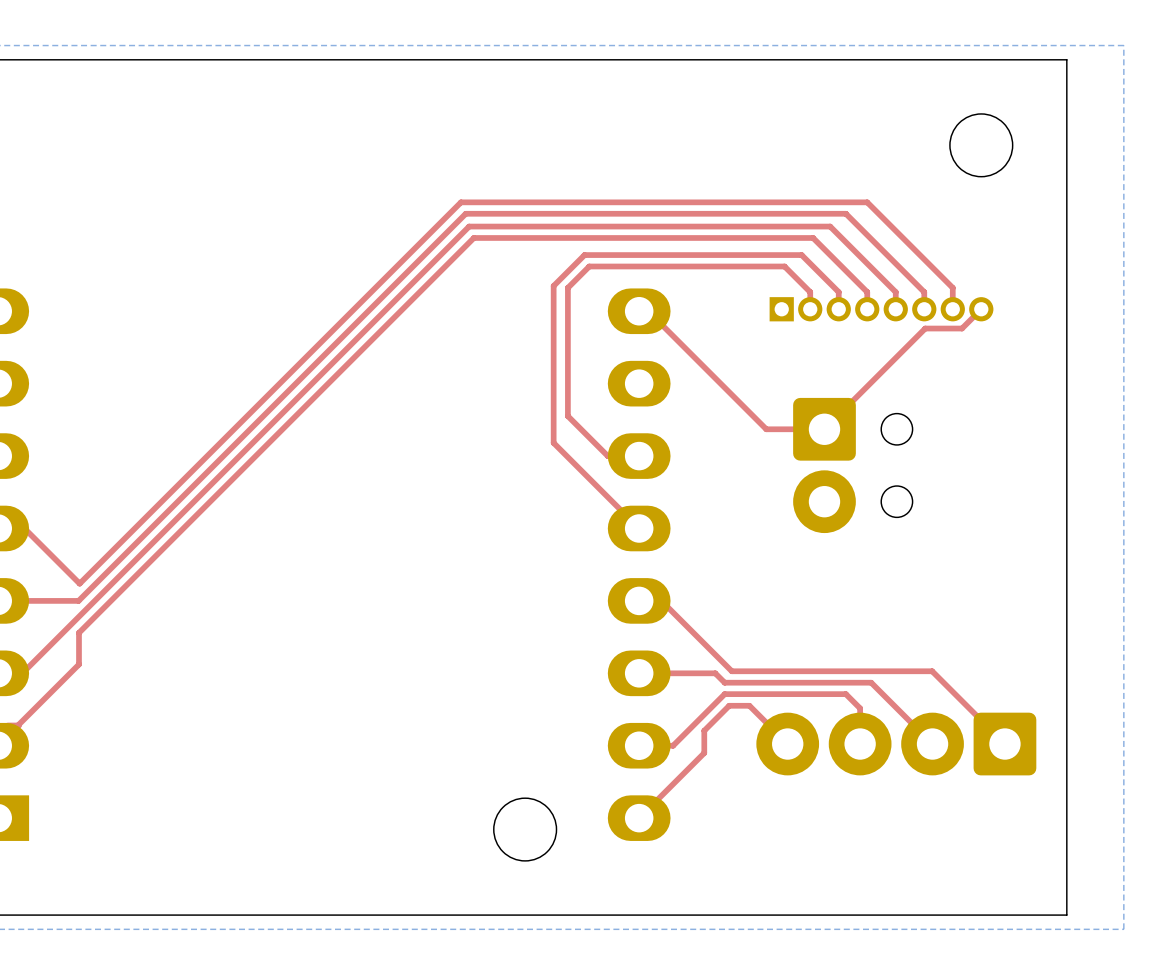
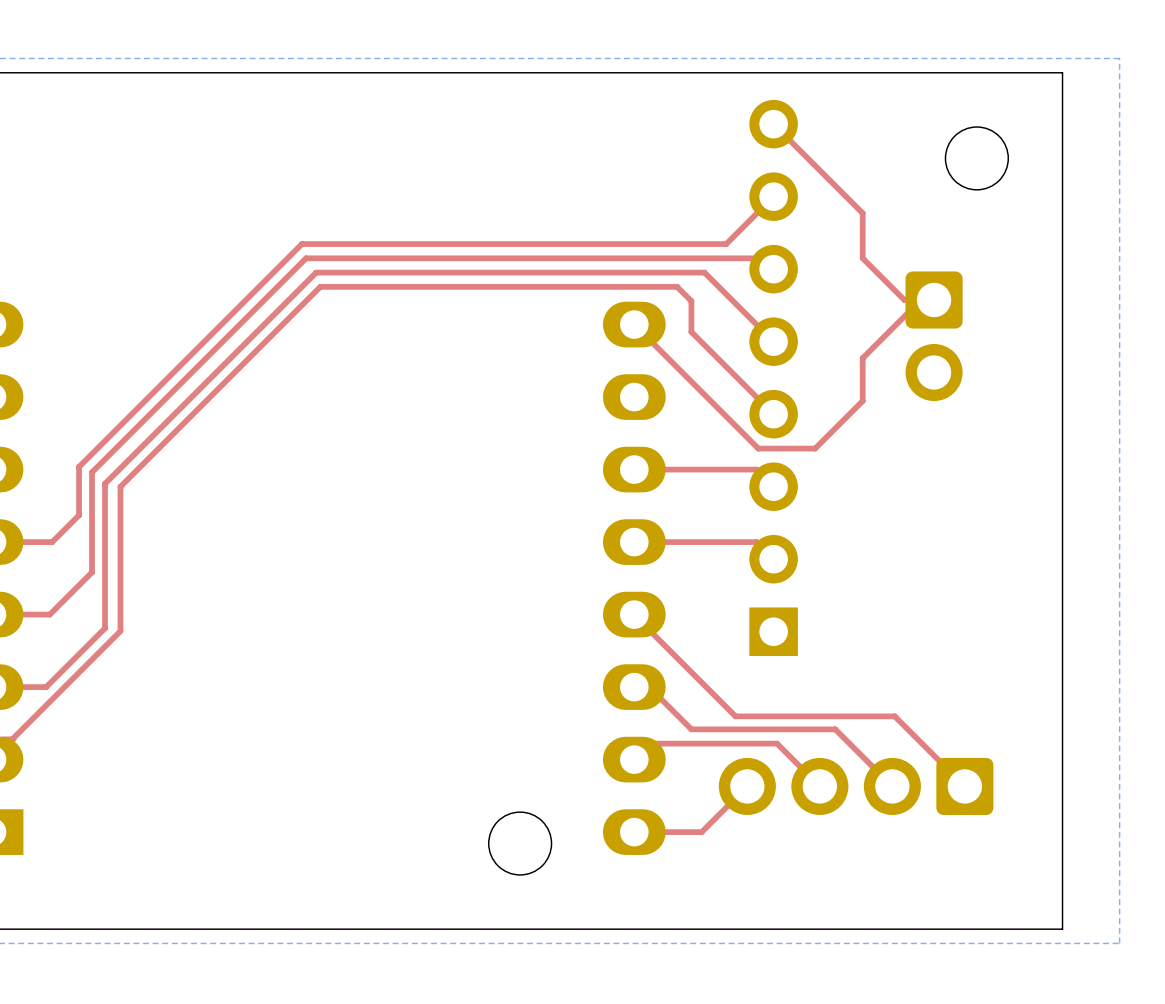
top track: none -> (773, 124) (862, 213) (862, 258) (904, 300) (934, 300)
top track: none -> (920, 300) (862, 358) (862, 401) (815, 448) (758, 448) (634, 324)
top track: (810, 309) (810, 292) (784, 266) (589, 266) (567, 287) (567, 416) (607, 456) (639, 456) -> (773, 486) (756, 469) (634, 469)
top track: (838, 309) (838, 292) (801, 255) (584, 255) (553, 285) (553, 442) (639, 528) -> (773, 559) (756, 542) (634, 542)
top track: (867, 309) (867, 292) (813, 237) (473, 237) (78, 632) (78, 664) -> (773, 414) (691, 331) (691, 301) (677, 286) (320, 286) (120, 486) (120, 631) (73, 678)
part: (881, 309) -> none
top track: (895, 309) (895, 292) (830, 226) (469, 226) (22, 673) -> (773, 341) (704, 272) (316, 272) (105, 483) (105, 628) (46, 687) (16, 687)
top track: (924, 309) (924, 292) (845, 213) (465, 213) (78, 600) (55, 600) -> (773, 269) (762, 258) (306, 258) (92, 472) (92, 572) (49, 614)
top track: (952, 309) (952, 287) (867, 202) (461, 202) (79, 583) (24, 528) -> (773, 196) (726, 244) (301, 244) (79, 466) (79, 515) (52, 542) (18, 542)
top track: (981, 309) (962, 328) (925, 328) (824, 429) (766, 429) (648, 311) -> none
part: none -> (934, 336)
part: none -> (773, 377)
part: (852, 465) -> none
top track: (639, 600) (661, 600) (731, 671) (932, 671) (1004, 744) -> (634, 615) (735, 716) (894, 716) (964, 786)
top track: (654, 673) (715, 673) (724, 682) (871, 682) (932, 744) -> (649, 687) (691, 729) (835, 729) (892, 786)
top track: (787, 744) (749, 705) (729, 705) (704, 730) (704, 753) (639, 818) -> (747, 786) (701, 832) (634, 832)
top track: (860, 744) (860, 708) (845, 694) (724, 694) (673, 745) (639, 745) -> (819, 786) (777, 743) (650, 743) (634, 759)
part: (896, 744) -> none
part: none -> (856, 786)

